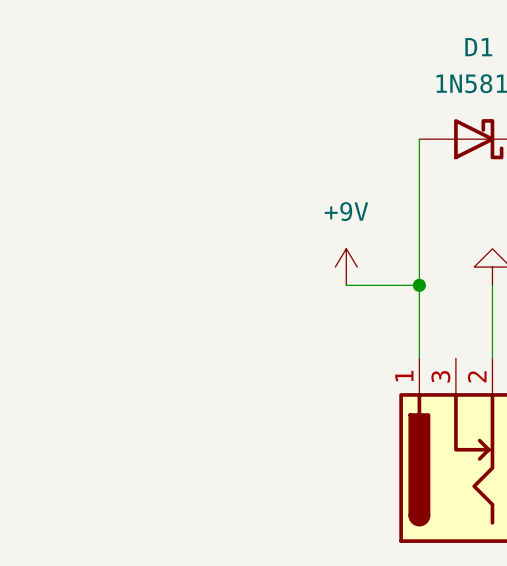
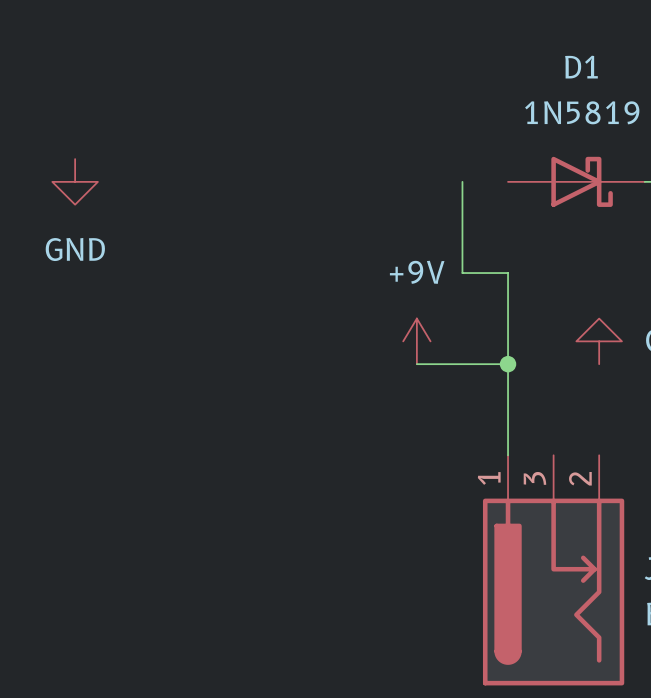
power symbol: none -> GND (75, 181)
wire: (419, 139) (419, 212) -> (462, 181) (462, 273) (508, 273)
wire: (492, 285) (492, 358) -> none

